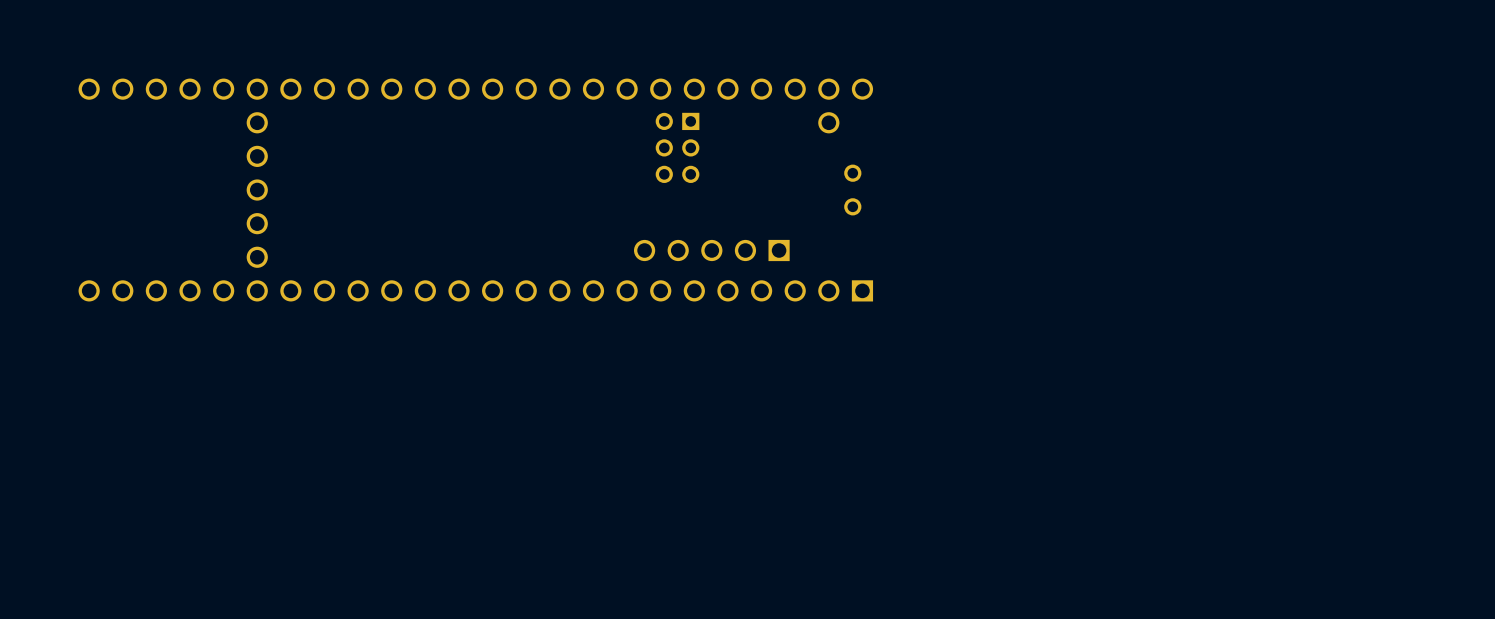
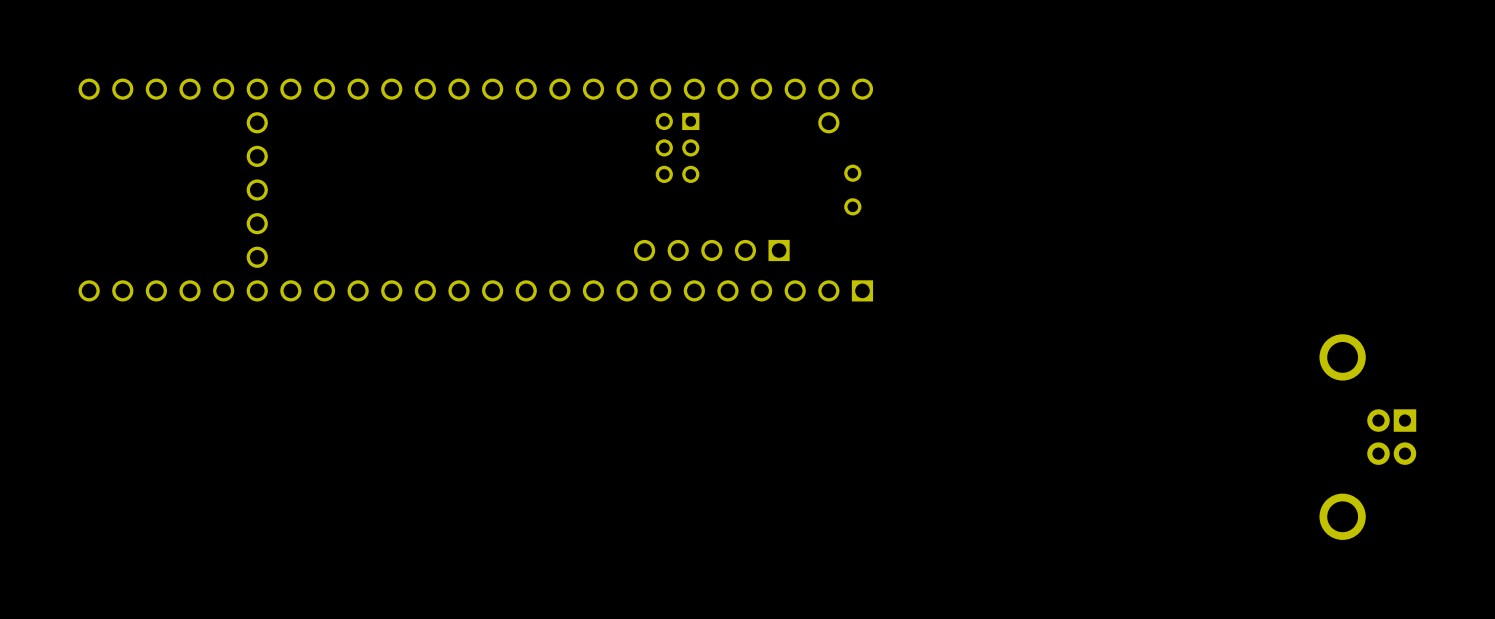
part: none -> (1367, 437)

